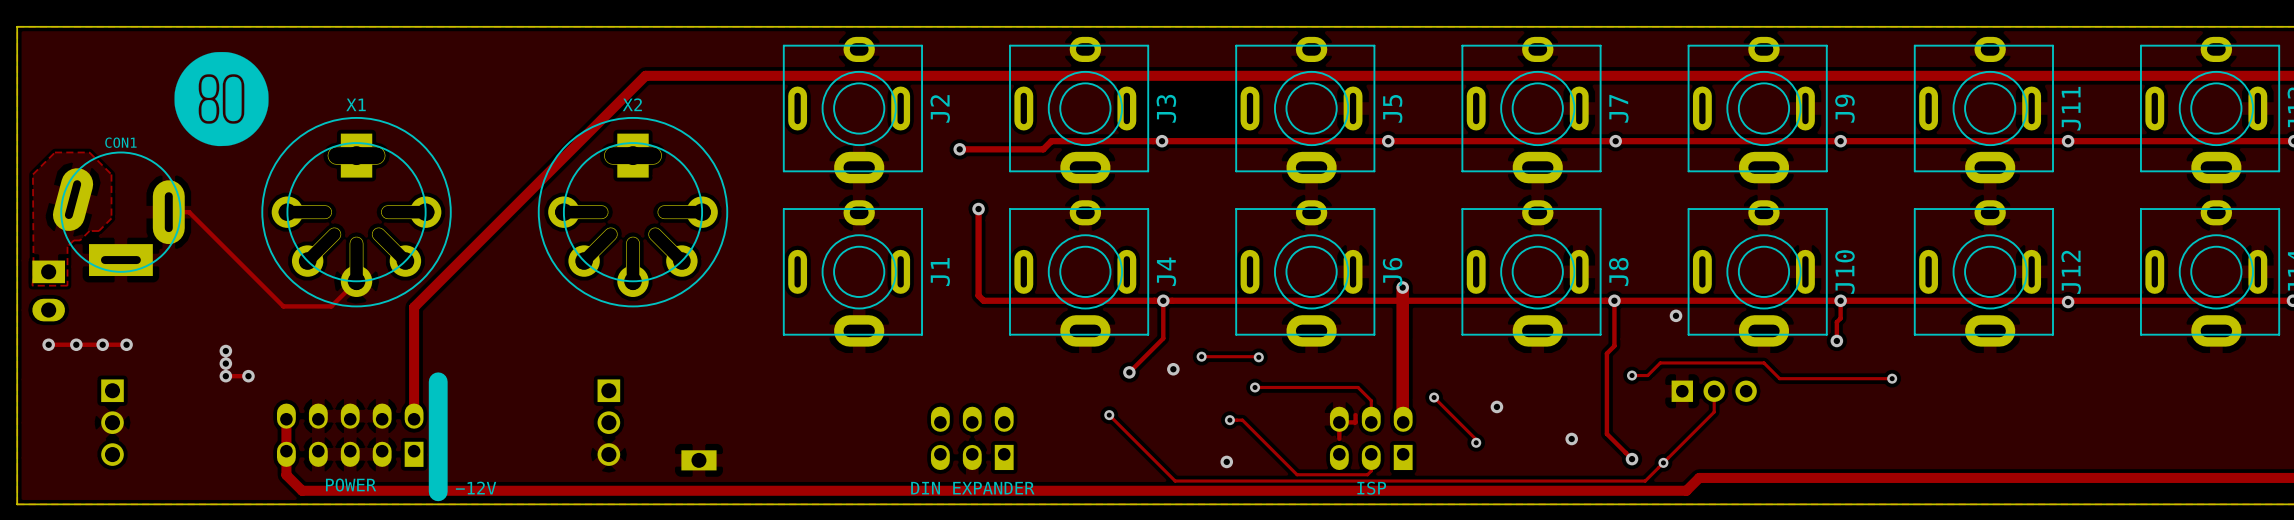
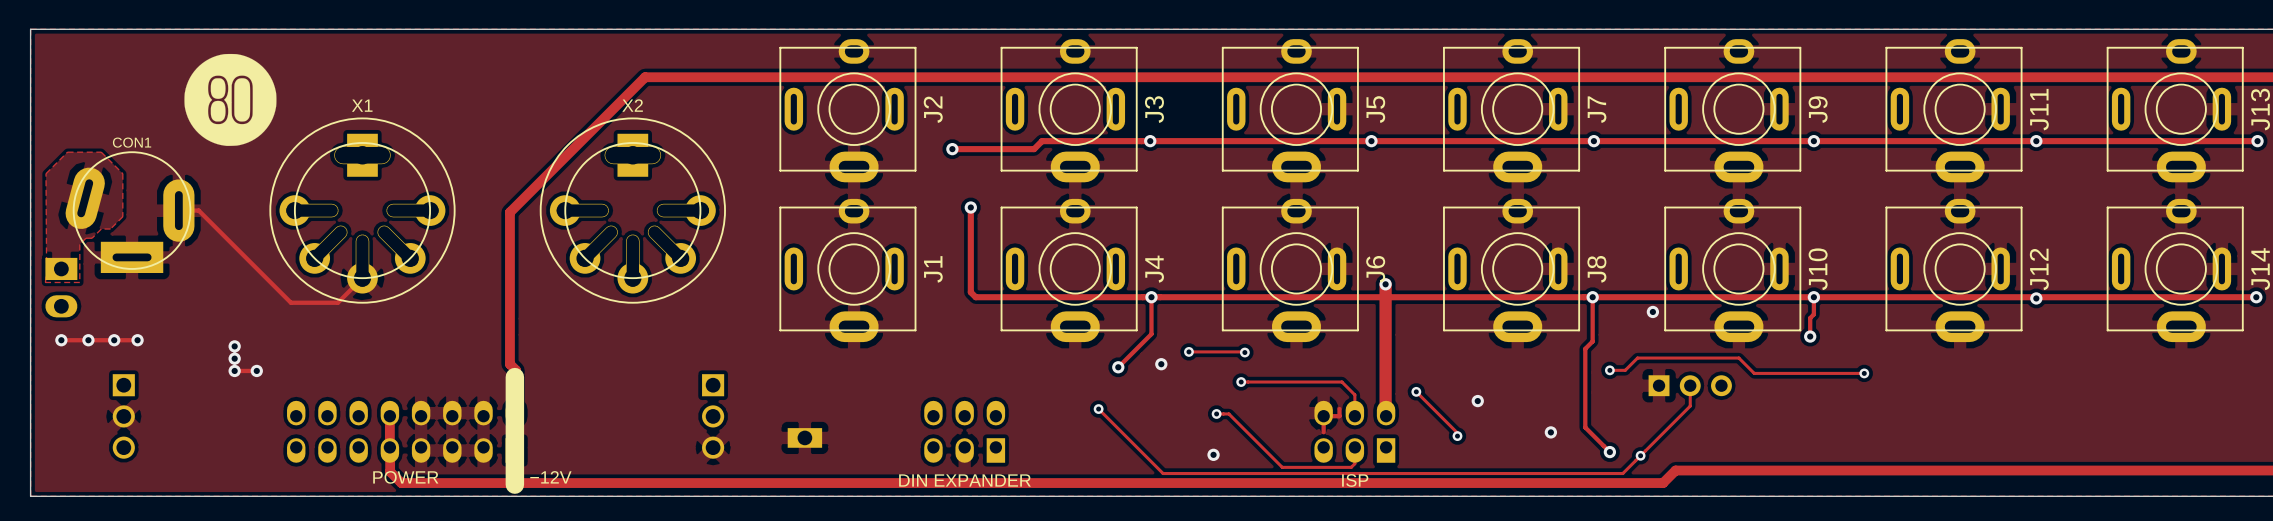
track: (507, 214) (414, 307) (414, 419) -> (509, 212) (509, 364) (516, 370) (514, 416)
line: (438, 381) (438, 491) -> (514, 377) (514, 484)
track: (286, 419) (286, 475) (302, 490) (396, 490) -> (389, 416) (390, 471) (401, 483)
part position: (608, 422) -> (713, 416)
part: (350, 435) -> none
part: none -> (405, 431)
part position: (698, 460) -> (804, 437)
text position: POWER (351, 485) -> POWER (405, 477)
text position: −12V (476, 488) -> −12V (550, 477)

